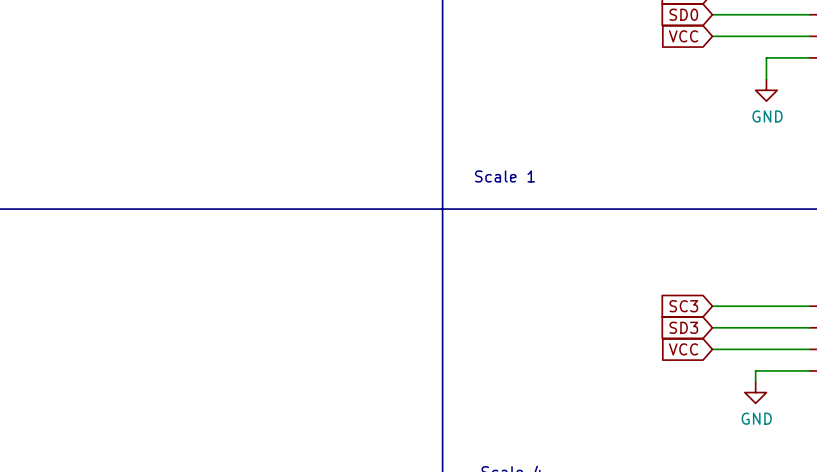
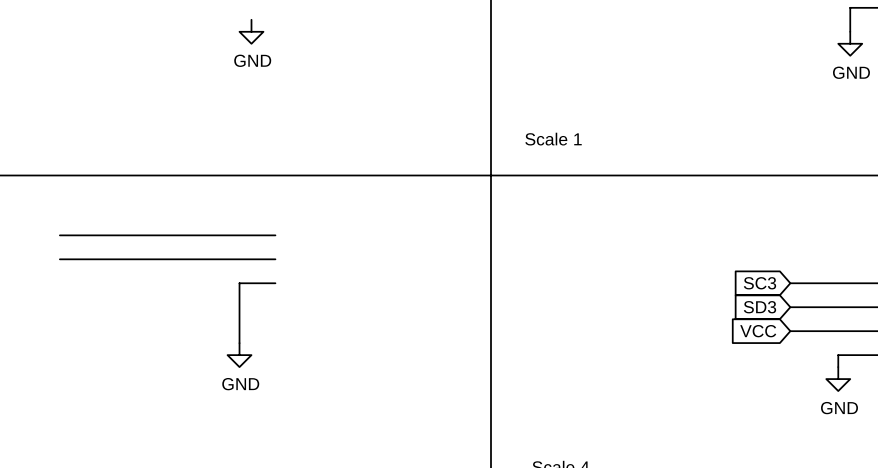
power symbol: none -> GND (251, 31)
wire: none -> (59, 235) (275, 235)
wire: none -> (59, 259) (275, 259)
wire: none -> (275, 283) (239, 283) (239, 343)
power symbol: none -> GND (239, 355)

